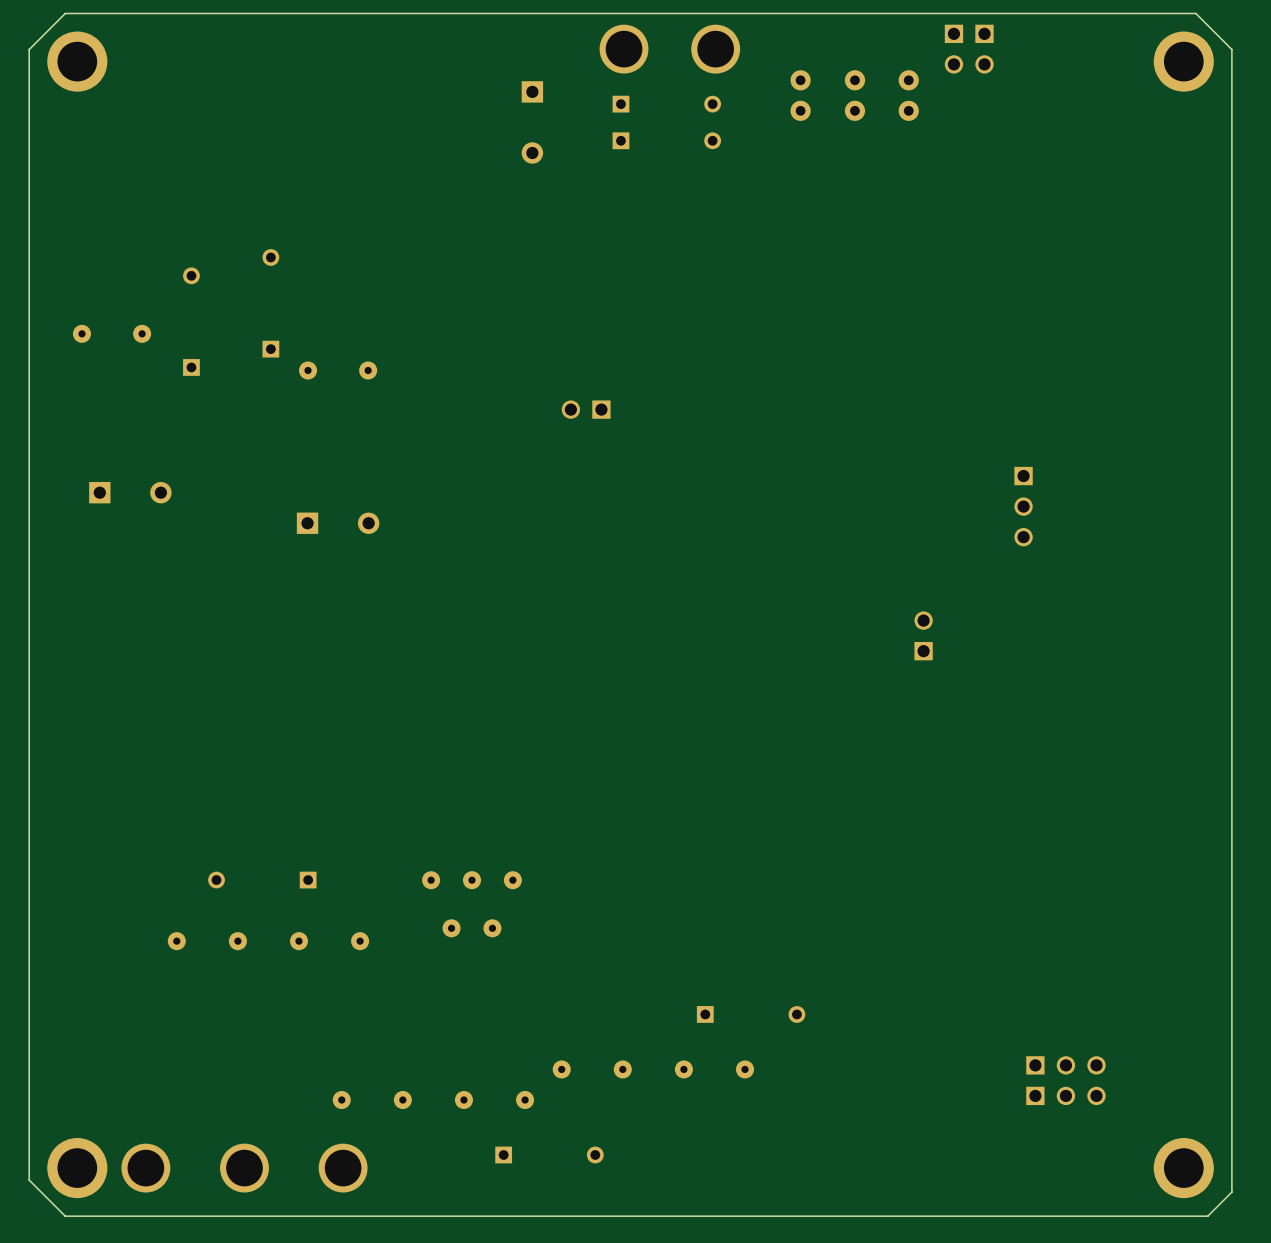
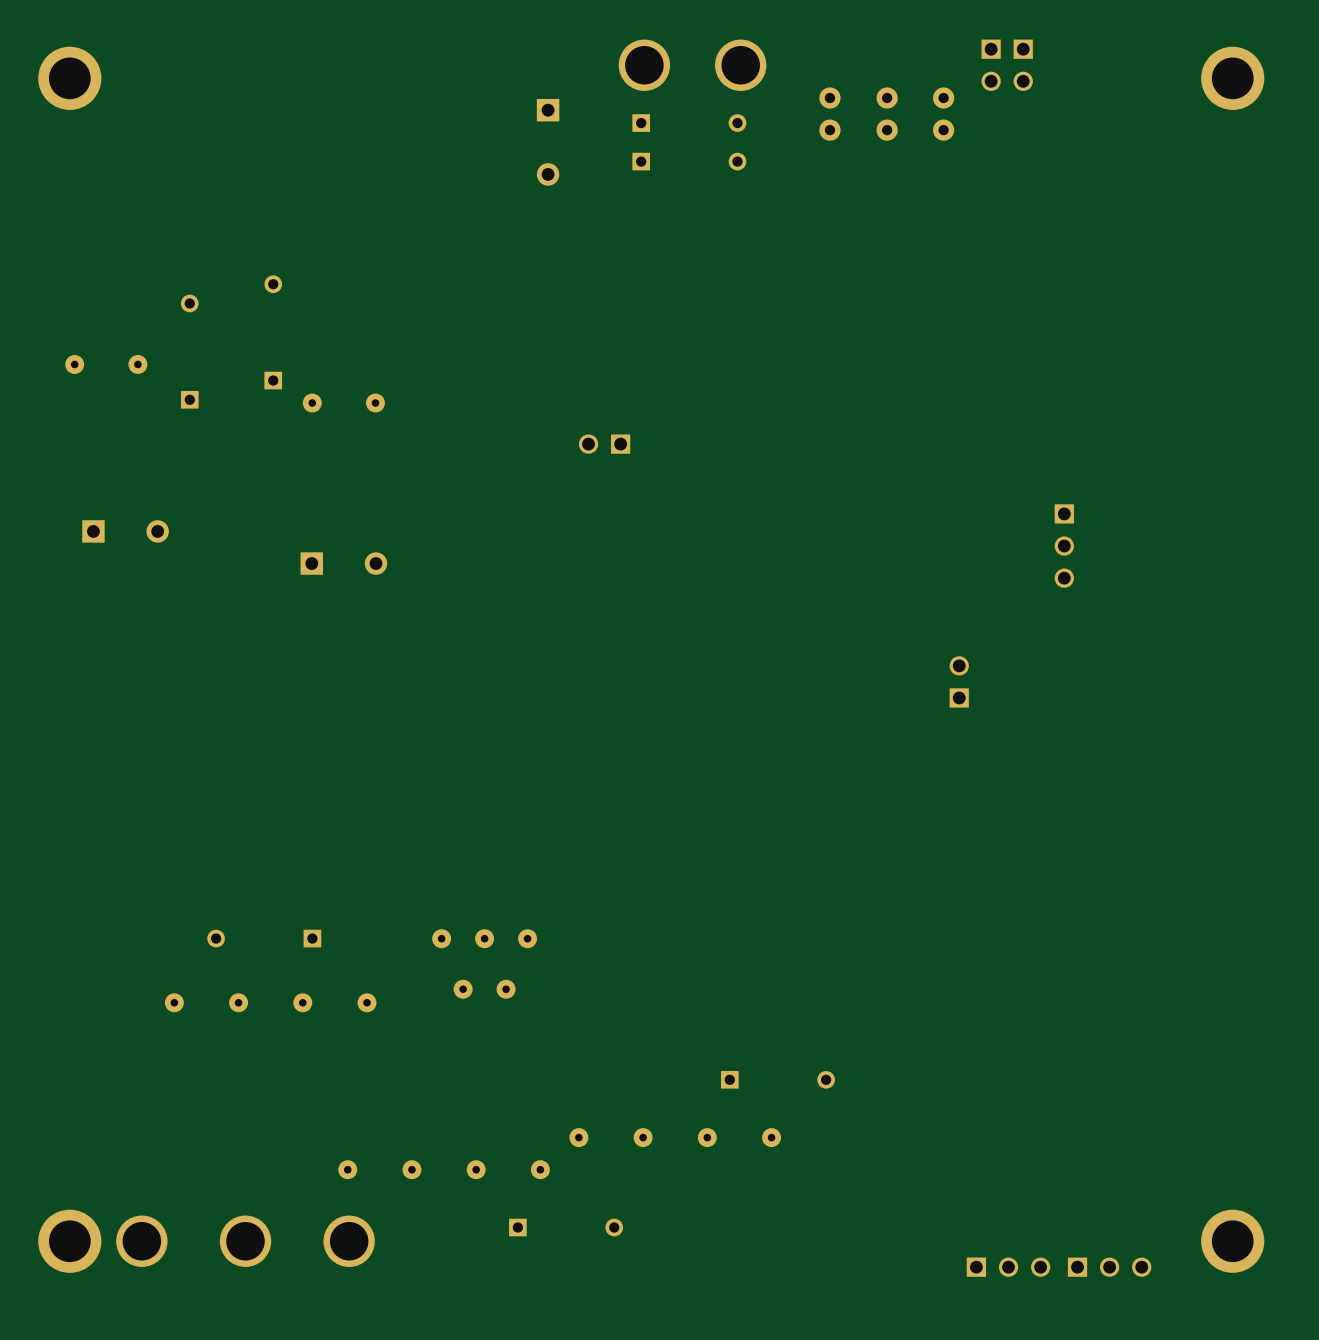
board edge: (1195, 13) (65, 13) (29, 49) (29, 1180) (65, 1216) (1207, 1216) (1231, 1192) (1231, 49) (1195, 13) -> none
part: (1065, 1065) -> none
part: (1065, 1095) -> none
part: none -> (1008, 1267)
part: none -> (1109, 1267)

